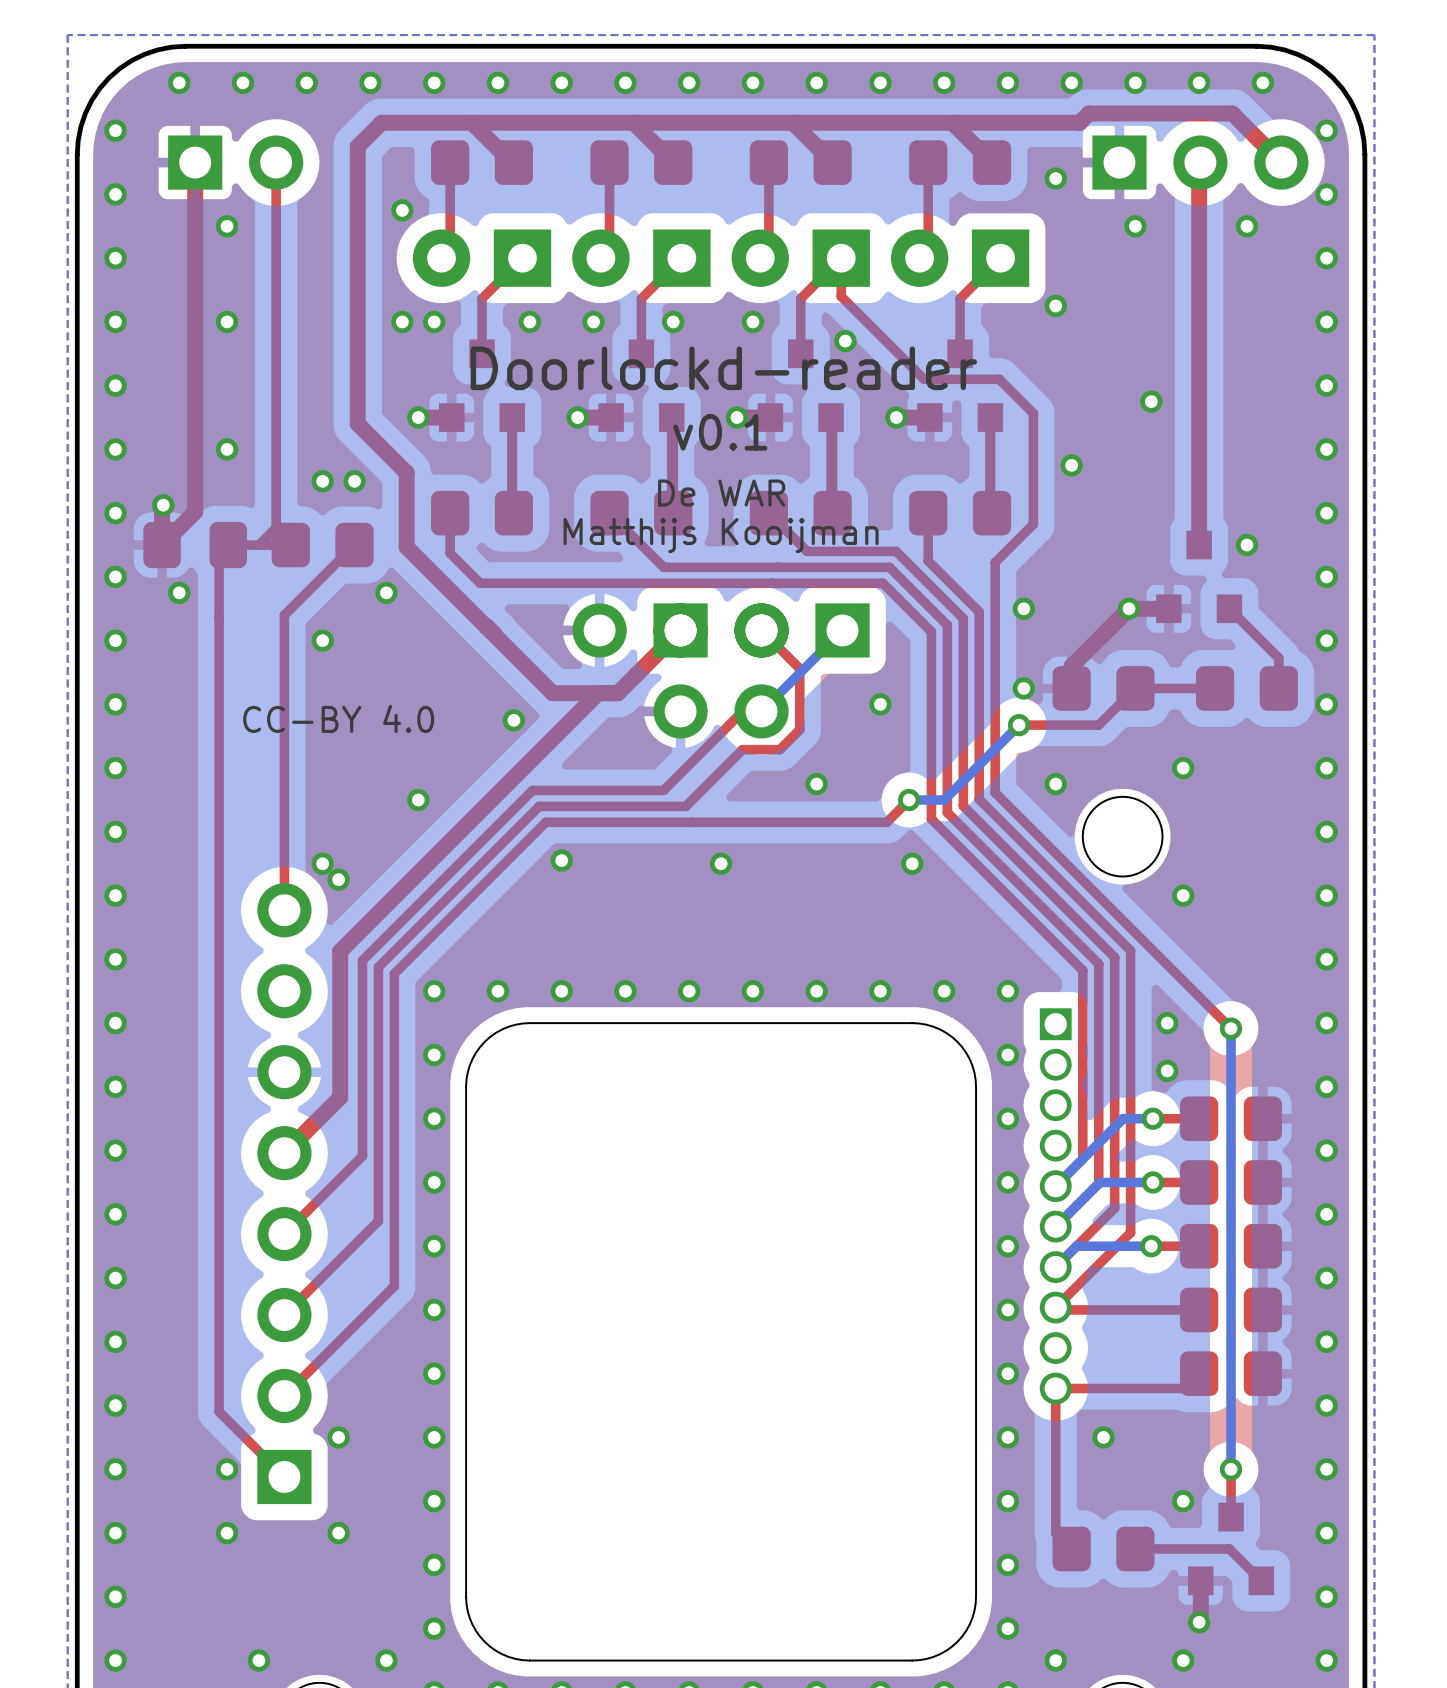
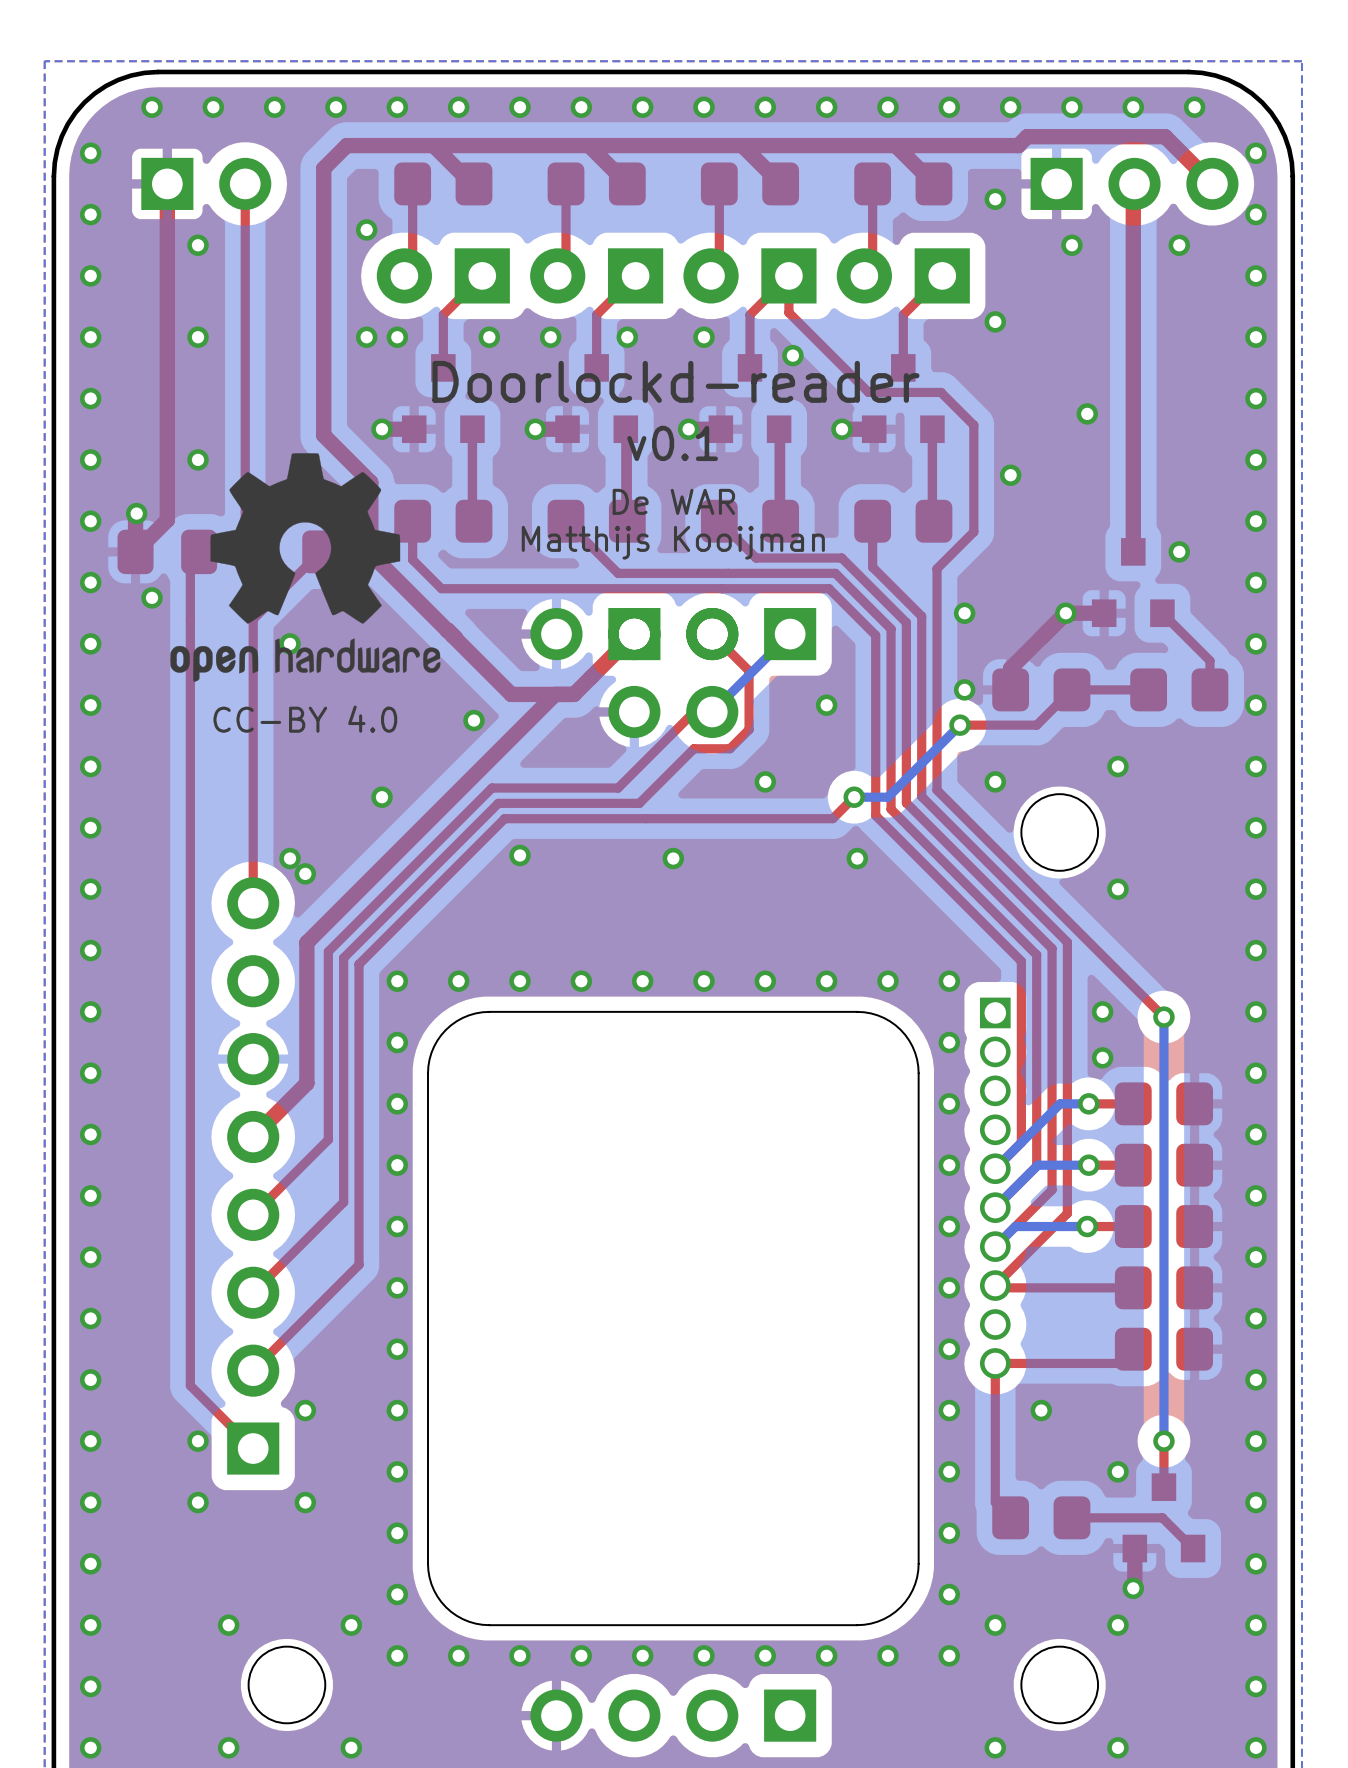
drawing: none -> [170, 453, 441, 682]

